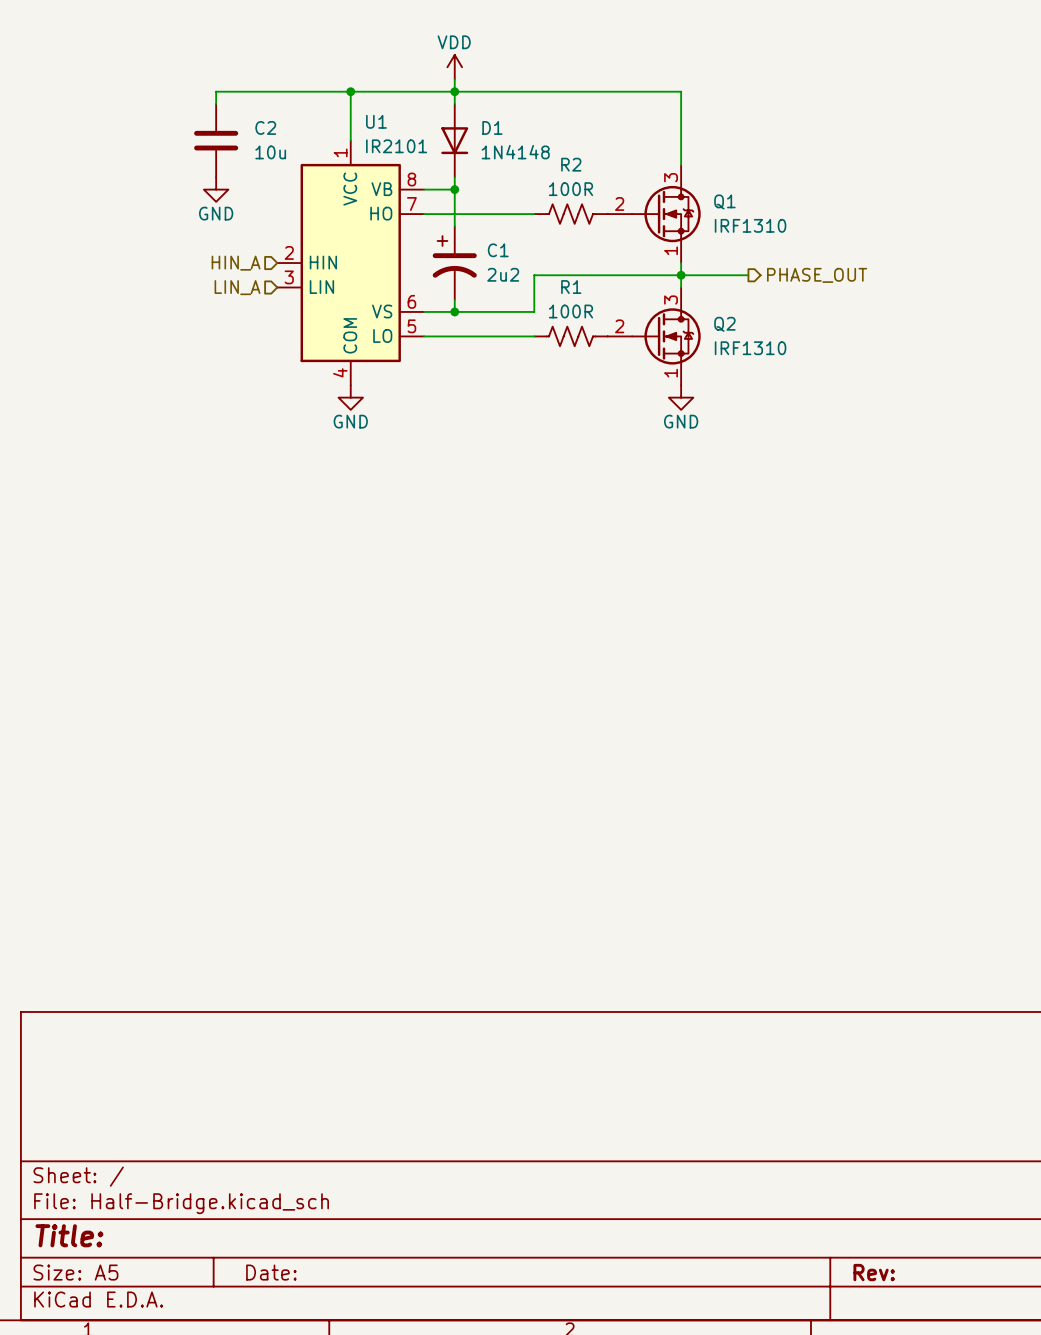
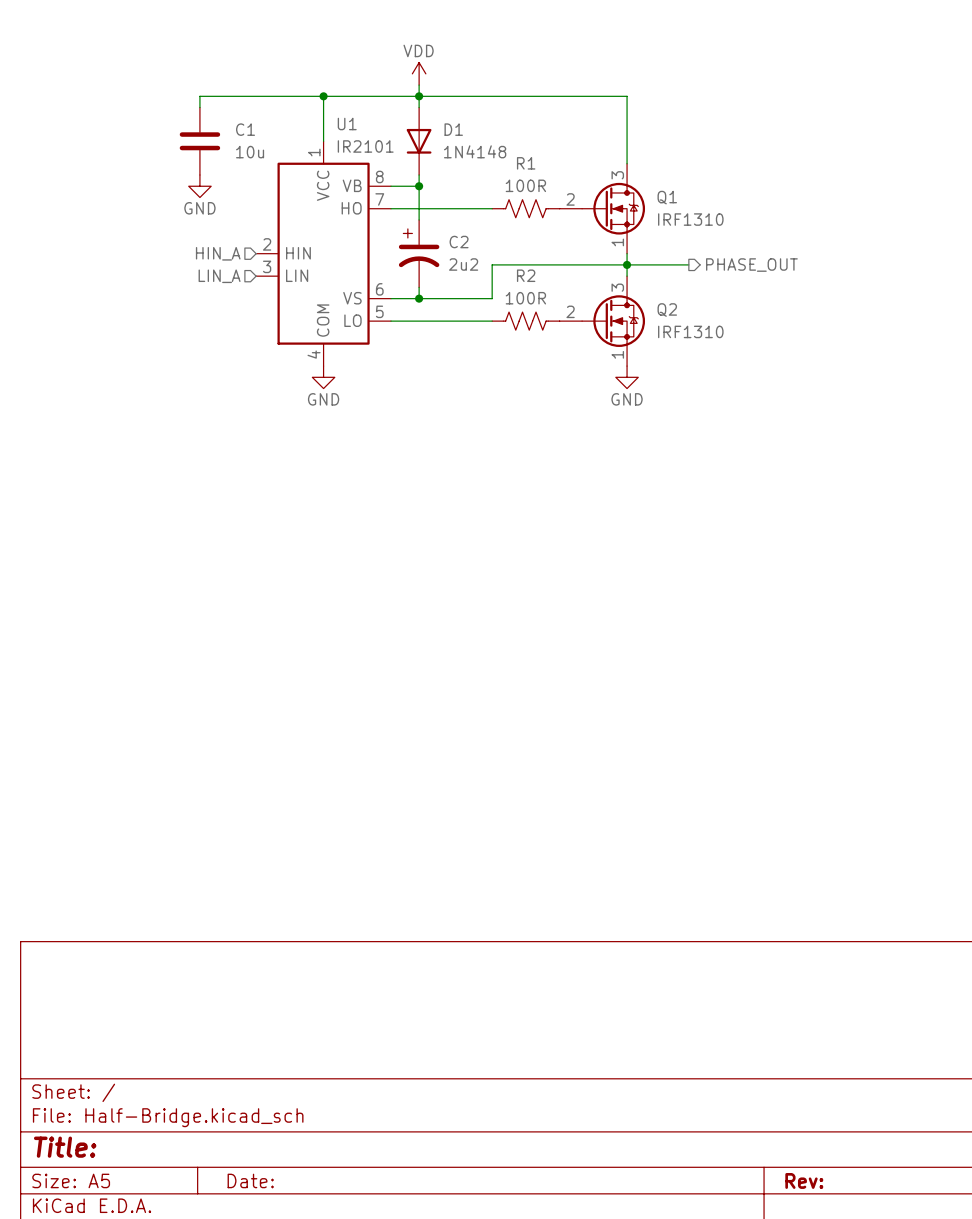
C2 name: C2 (265, 127) -> C1 (245, 129)
R2 name: R2 (571, 164) -> R1 (526, 163)
C1 name: C1 (498, 250) -> C2 (459, 242)
R1 name: R1 (571, 287) -> R2 (526, 275)

